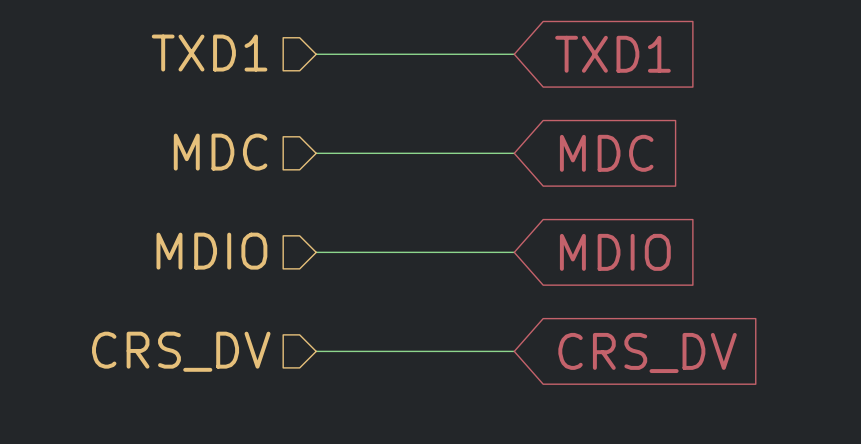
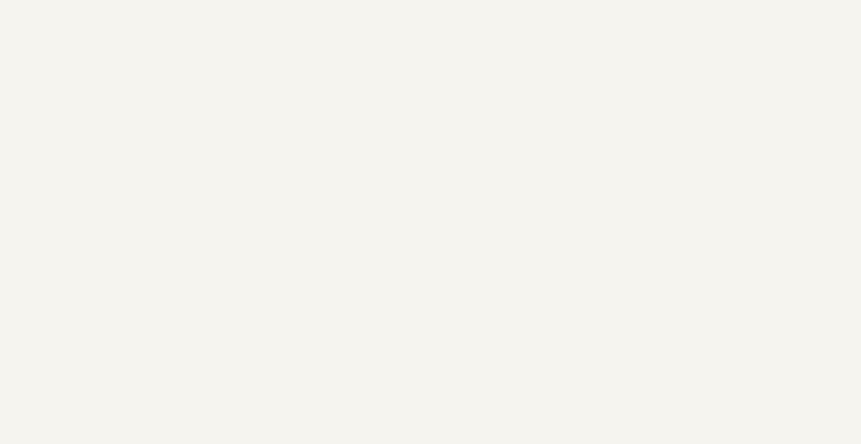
hierarchical label: TXD1 (209, 53) -> none
wire: (316, 54) (514, 54) -> none
global label: TXD1 (612, 54) -> none
hierarchical label: MDC (220, 152) -> none
wire: (316, 153) (514, 153) -> none
global label: MDC (606, 153) -> none
hierarchical label: MDIO (211, 251) -> none
wire: (316, 252) (514, 252) -> none
global label: MDIO (615, 252) -> none
hierarchical label: CRS_DV (181, 351) -> none
wire: (316, 351) (514, 351) -> none
global label: CRS_DV (647, 352) -> none

